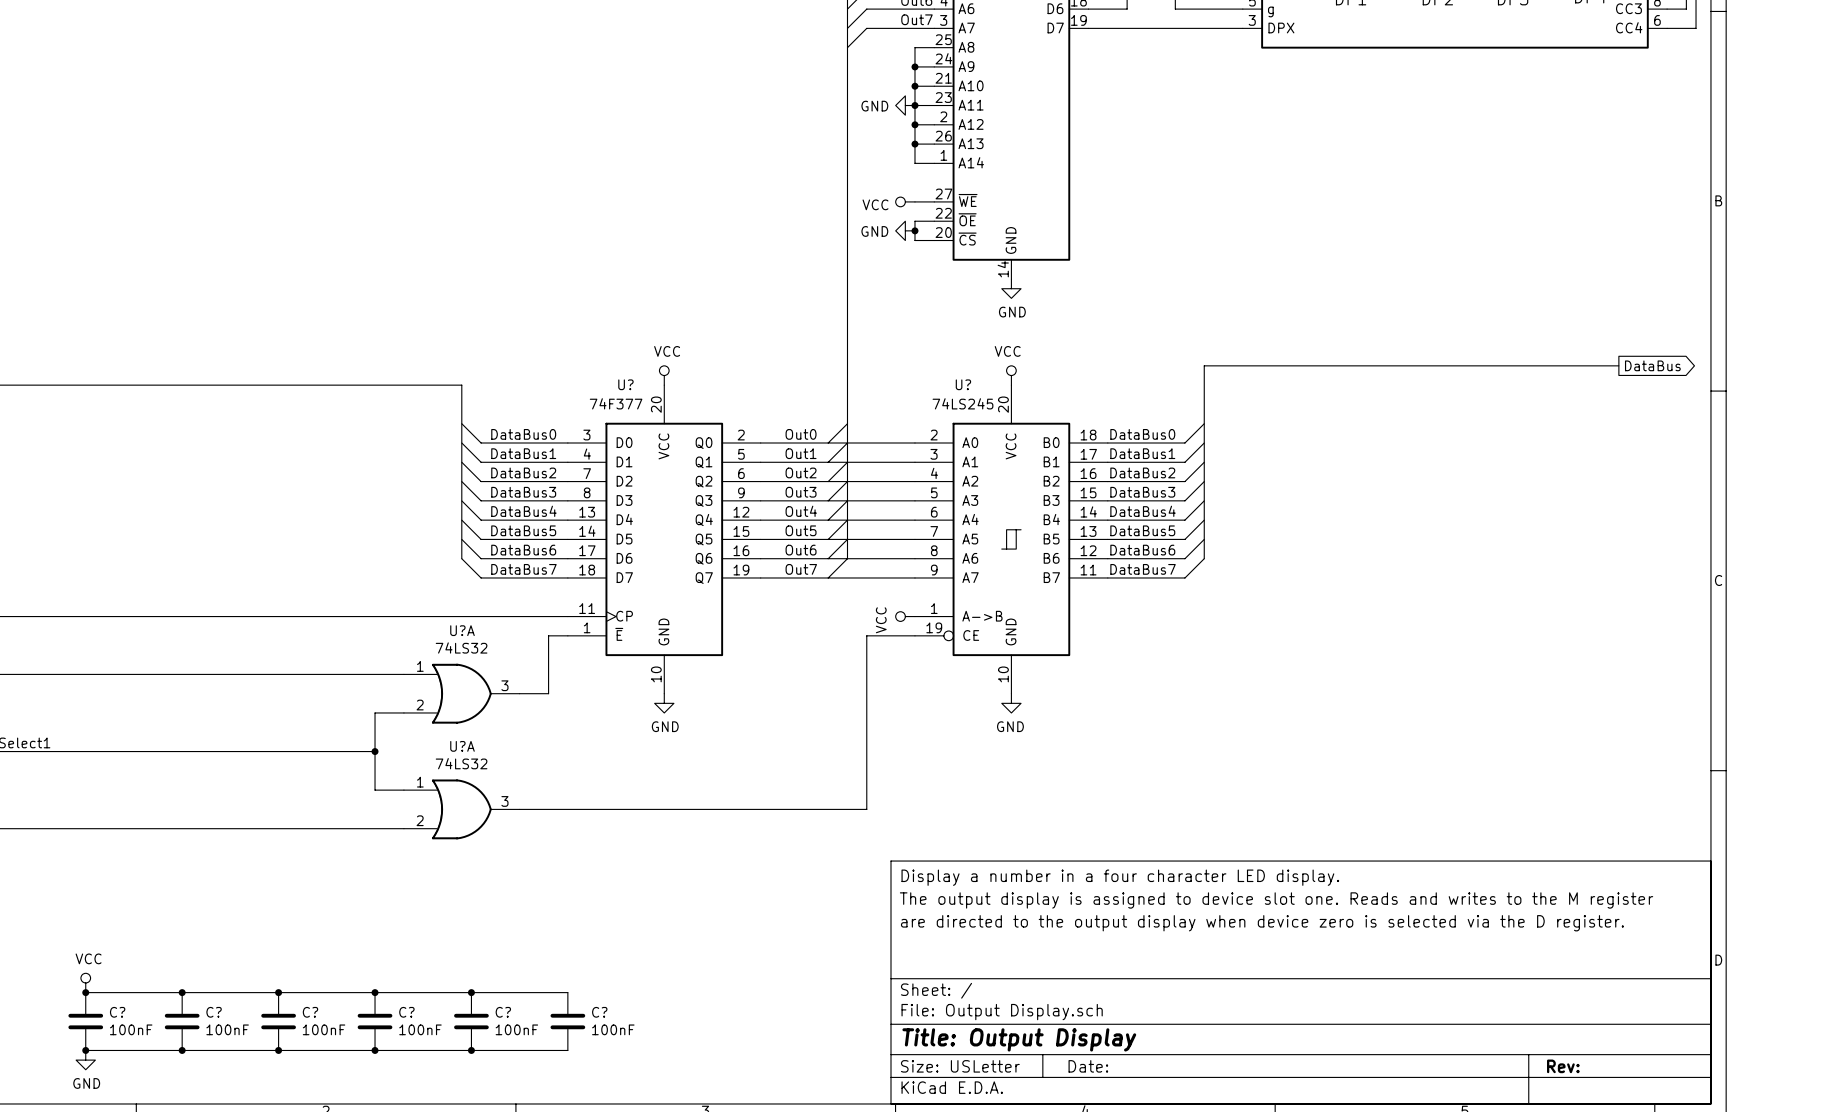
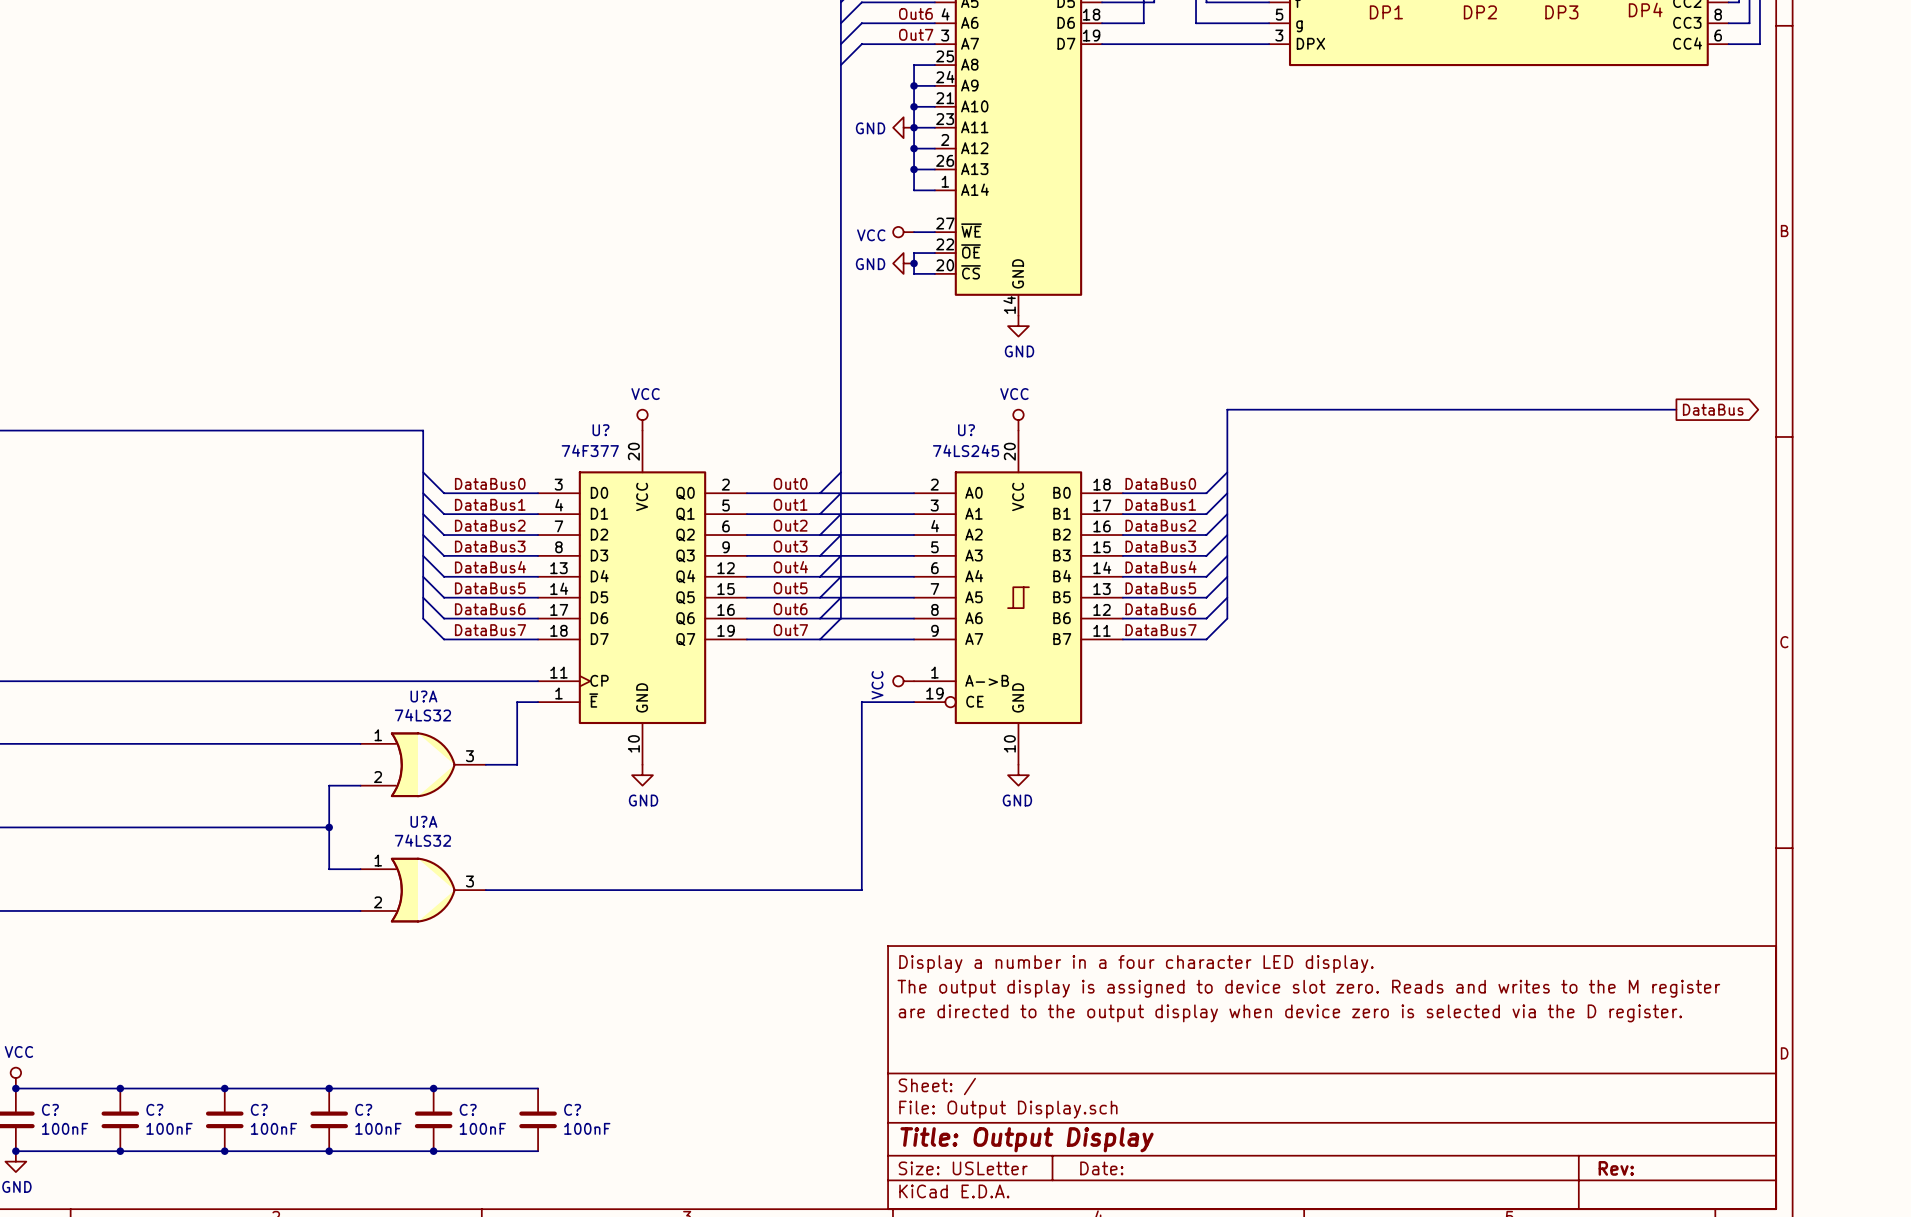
title block: The output display is assigned to device slot one. Reads and writes to the M register (1276, 900) -> The output display is assigned to device slot zero. Reads and writes to the M register (1308, 988)

